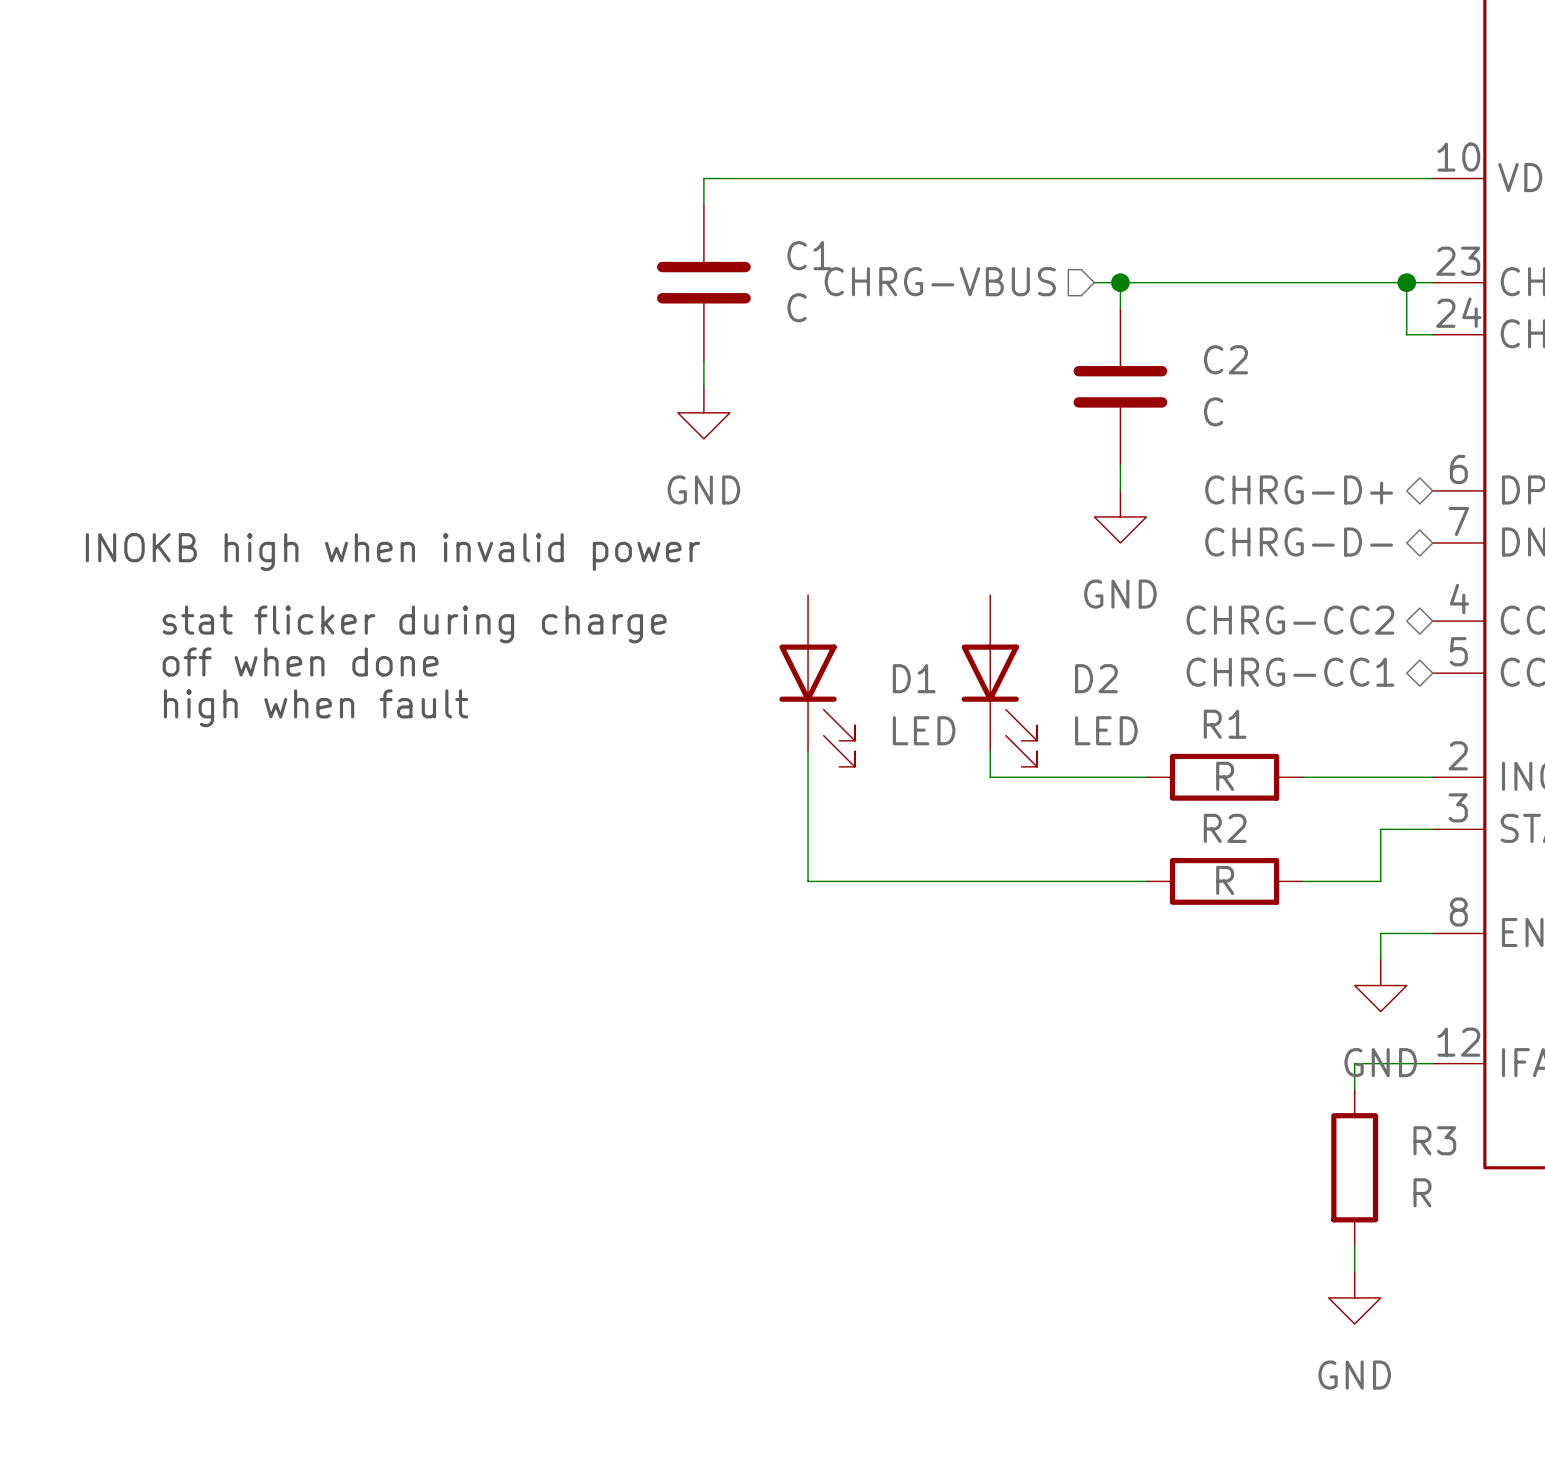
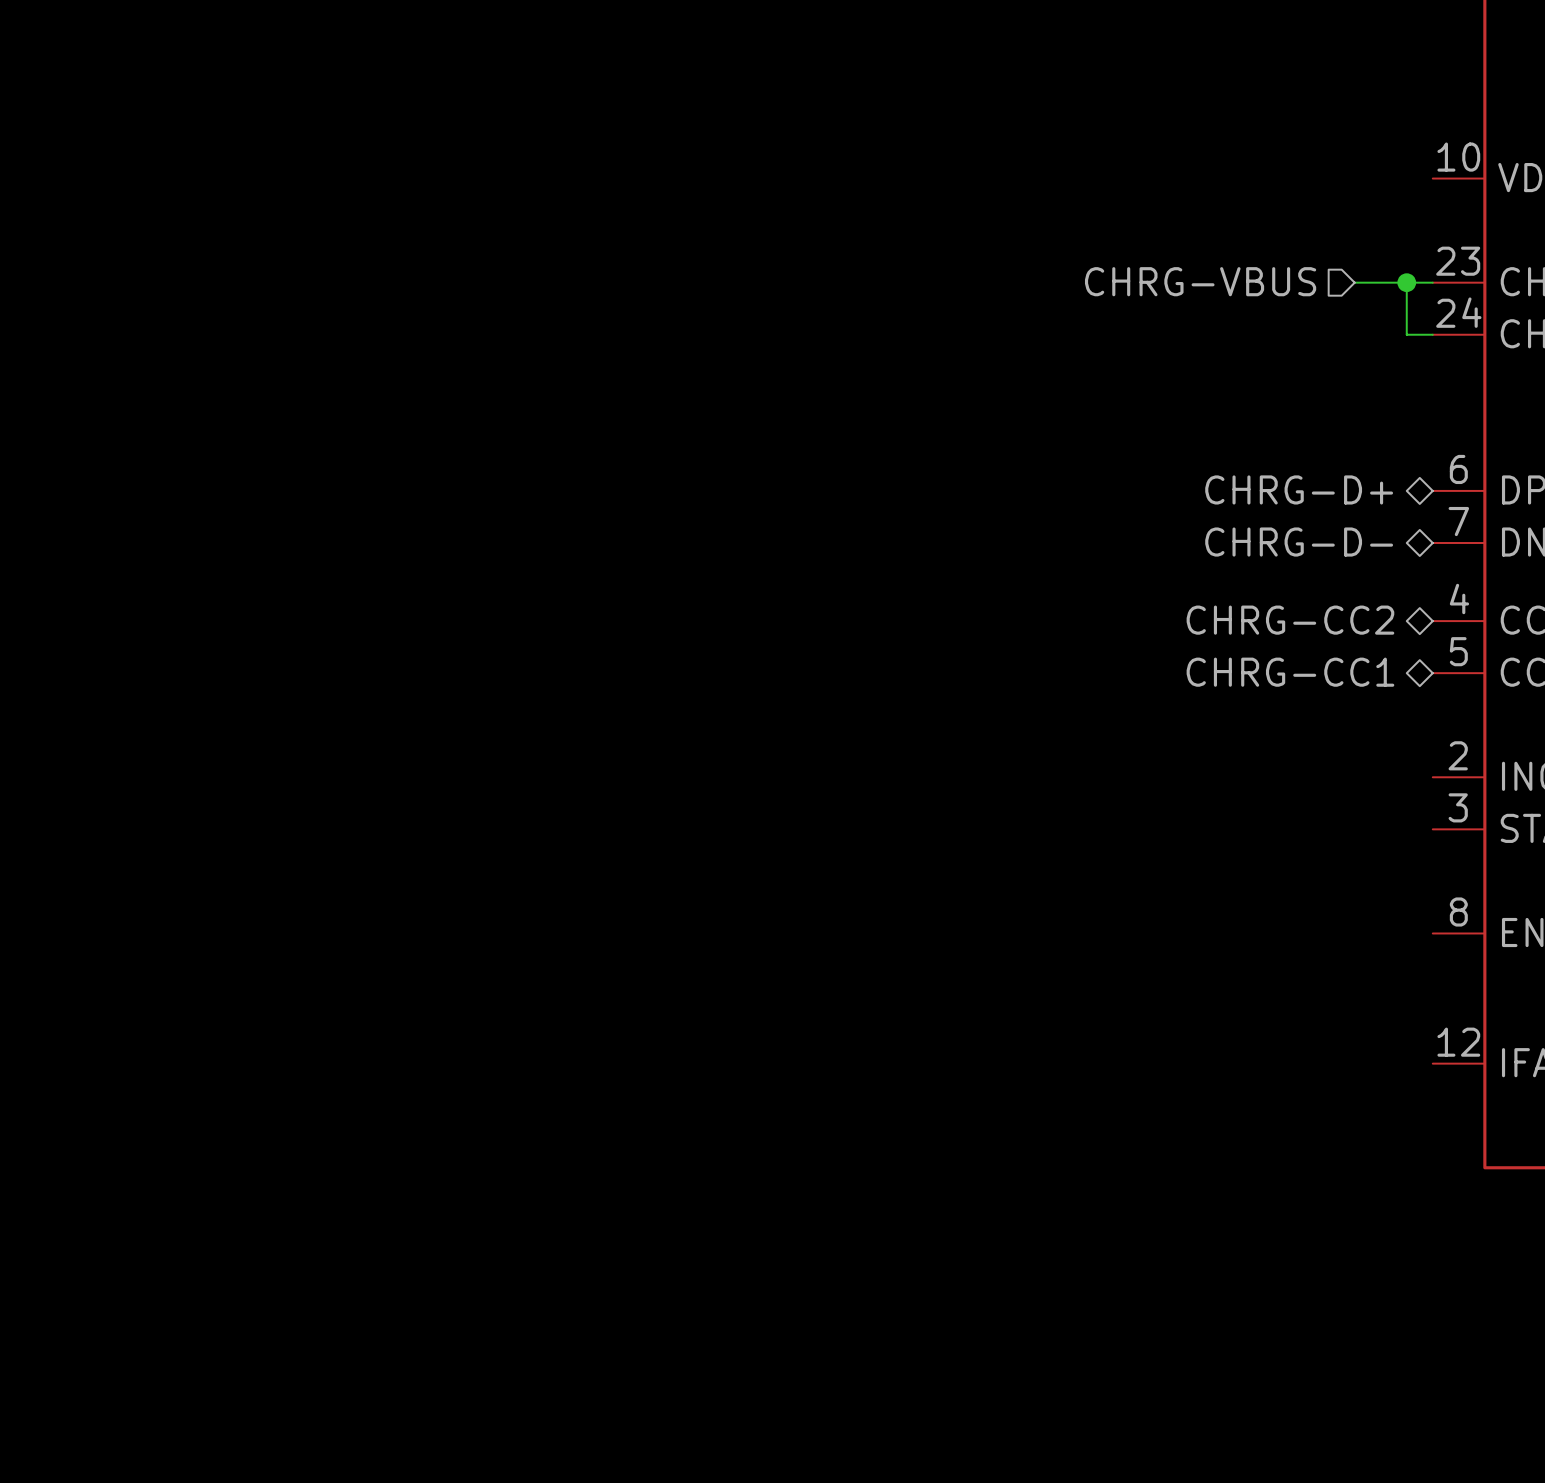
wire: (1432, 178) (703, 178) (703, 204) -> none
hierarchical label position: CHRG-VBUS (940, 281) -> CHRG-VBUS (1200, 281)
C1: C (703, 282) -> none
wire: (1094, 282) (1354, 282) -> none
wire: (1120, 282) (1120, 308) -> none
junction: (1120, 282) -> none
wire: (703, 360) (703, 386) -> none
C2: C (1120, 386) -> none
power symbol: GND (703, 412) -> none
wire: (1120, 464) (1120, 490) -> none
power symbol: GND (1120, 516) -> none
text: INOKB high when invalid power (392, 552) -> none
text: stat flicker during charge (414, 624) -> none
text: off when done (300, 661) -> none
D1: LED (817, 680) -> none
D2: LED (999, 680) -> none
text: high when fault (316, 708) -> none
wire: (808, 751) (808, 881) (1146, 881) -> none
wire: (990, 751) (990, 777) (1146, 777) -> none
R1: R (1224, 777) -> none
wire: (1302, 777) (1432, 777) -> none
wire: (1432, 829) (1380, 829) (1380, 881) (1302, 881) -> none
R2: R (1224, 881) -> none
wire: (1432, 933) (1380, 933) (1380, 959) -> none
power symbol: GND (1380, 985) -> none
wire: (1432, 1063) (1354, 1063) (1354, 1089) -> none
R3: R (1354, 1167) -> none
wire: (1354, 1245) (1354, 1271) -> none
power symbol: GND (1354, 1297) -> none

